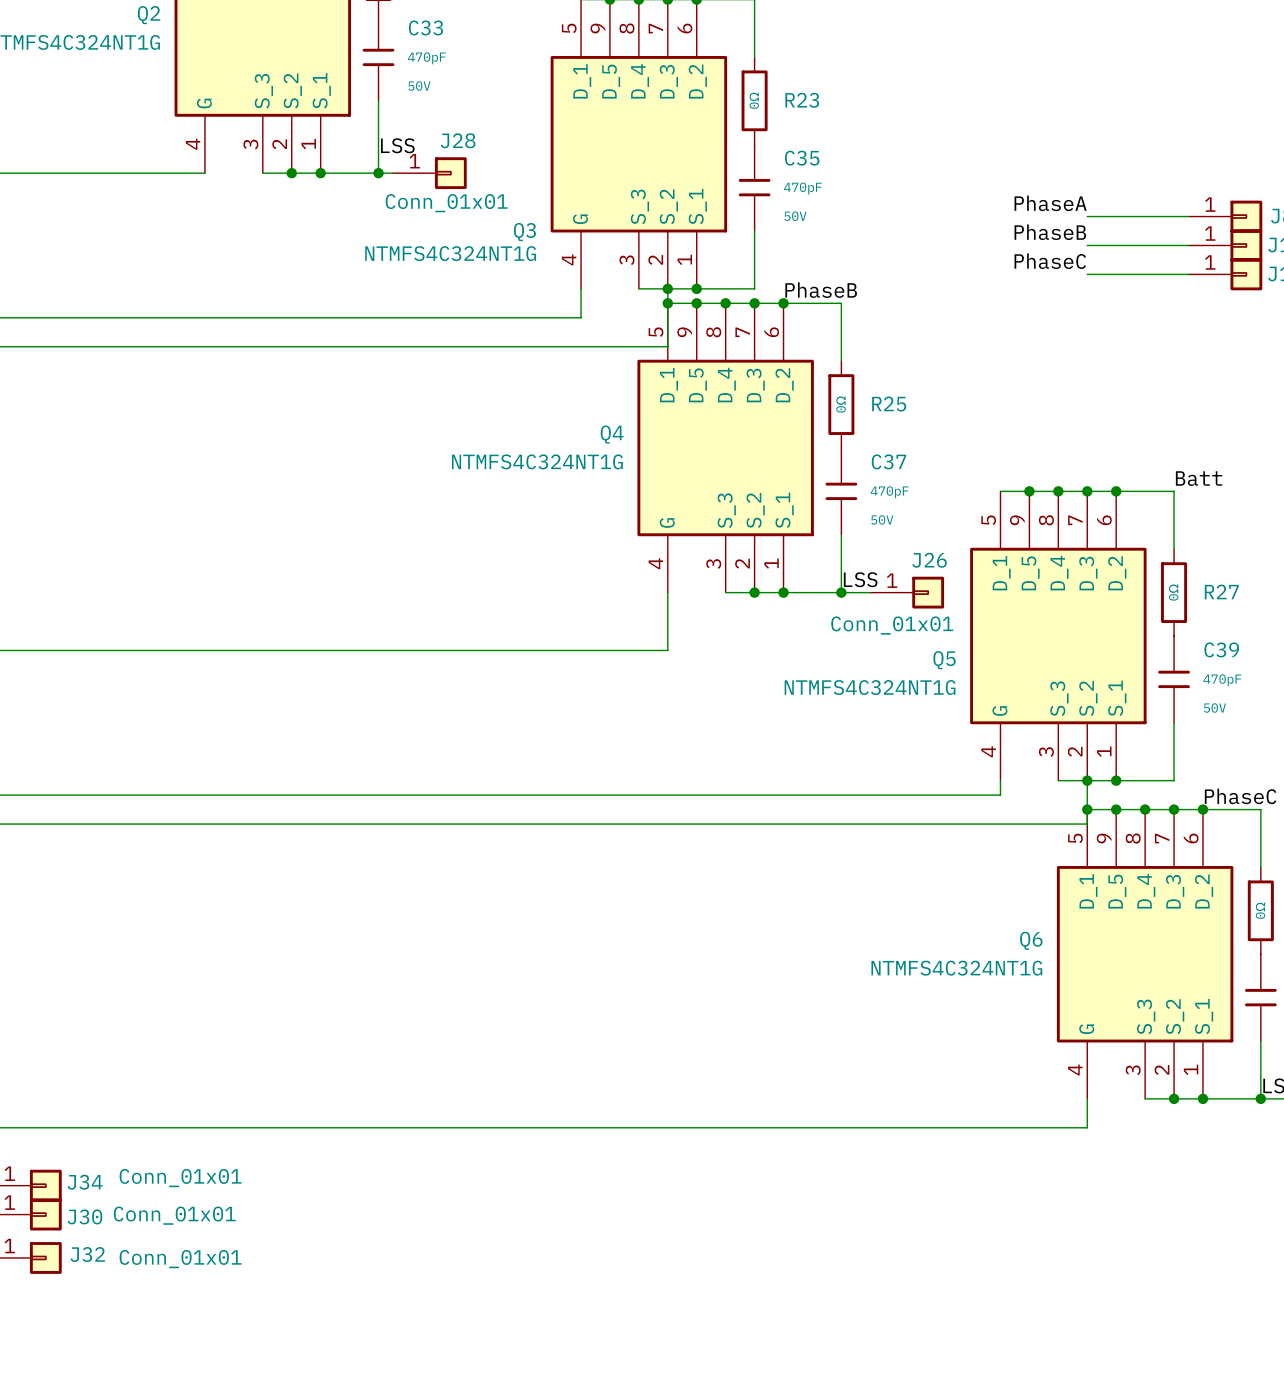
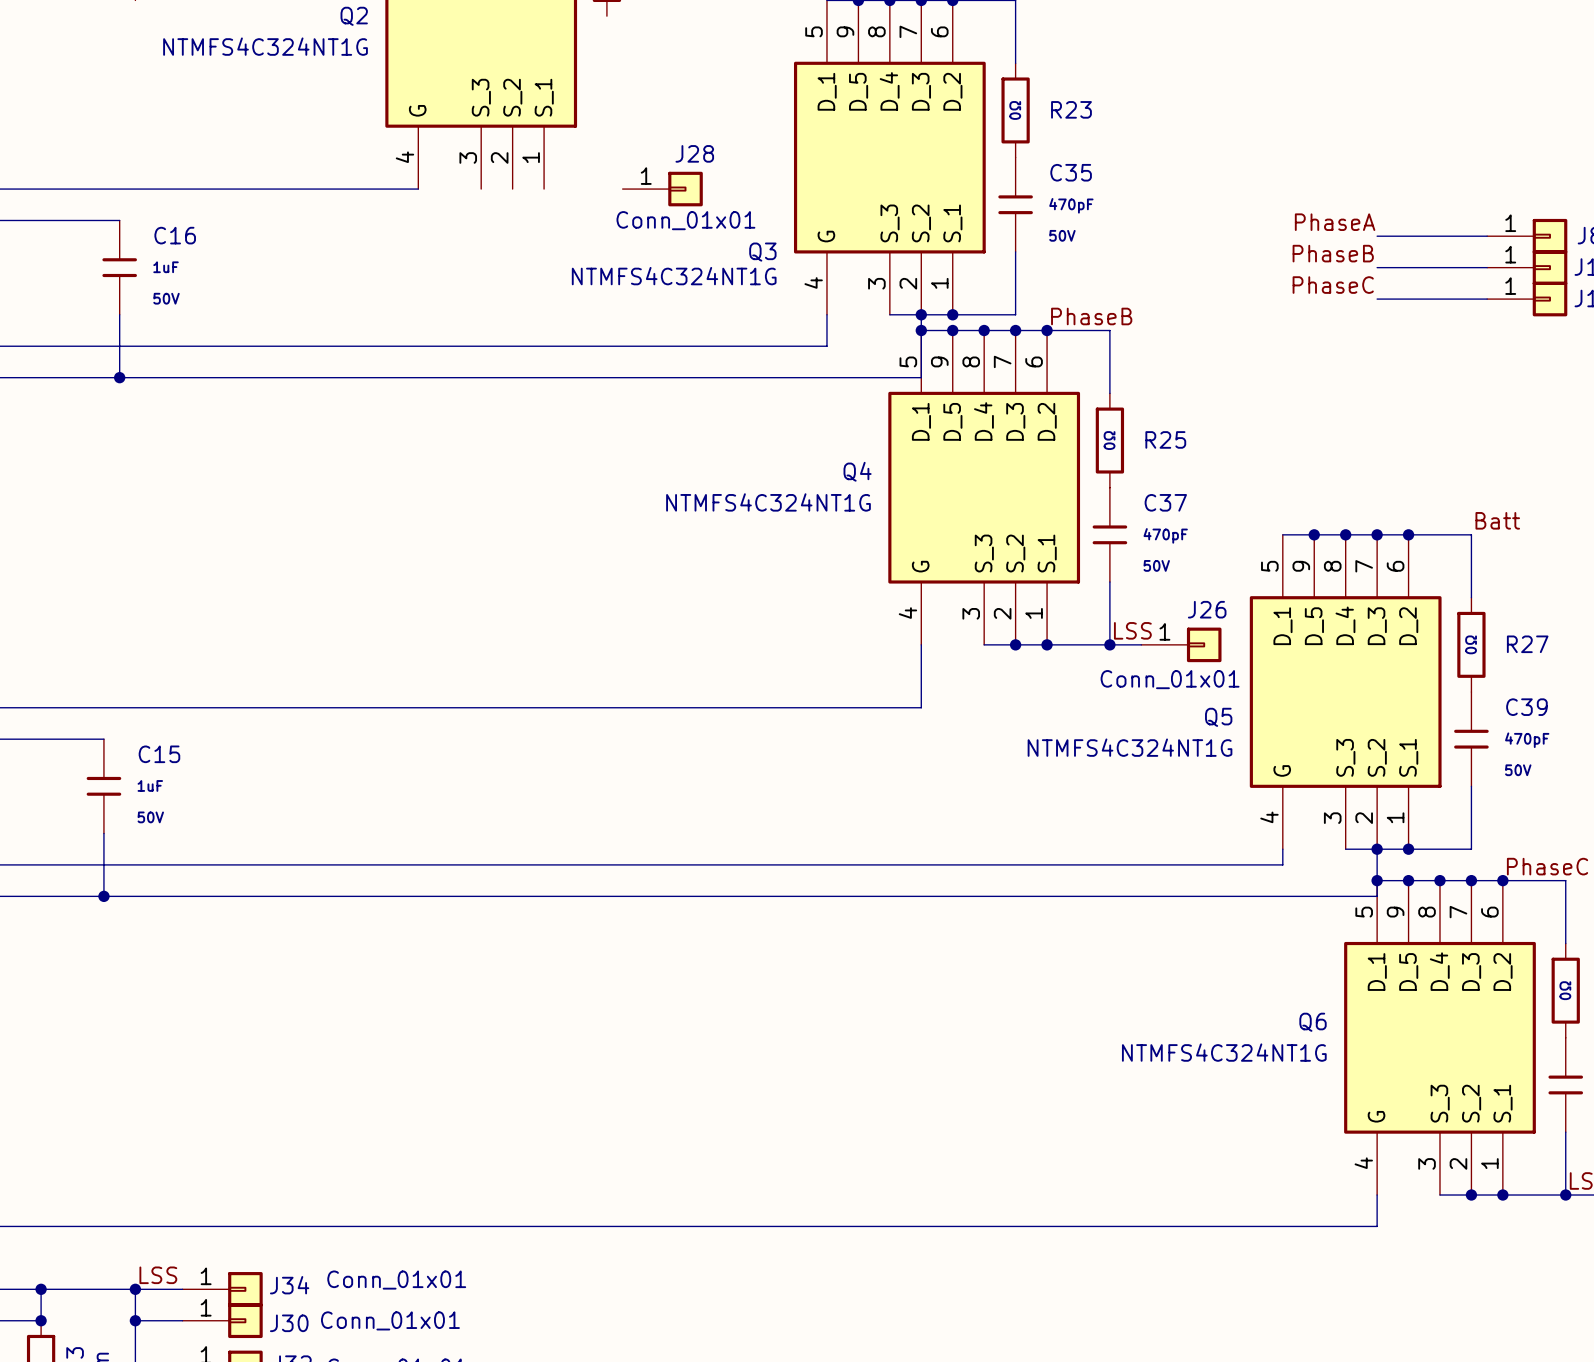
C33: 470pF (378, 57) -> none
wire: (378, 100) (378, 173) -> none
label: LSS (397, 145) -> none
wire: (262, 173) (392, 173) -> none
junction: (291, 173) -> none
junction: (320, 173) -> none
junction: (378, 173) -> none

